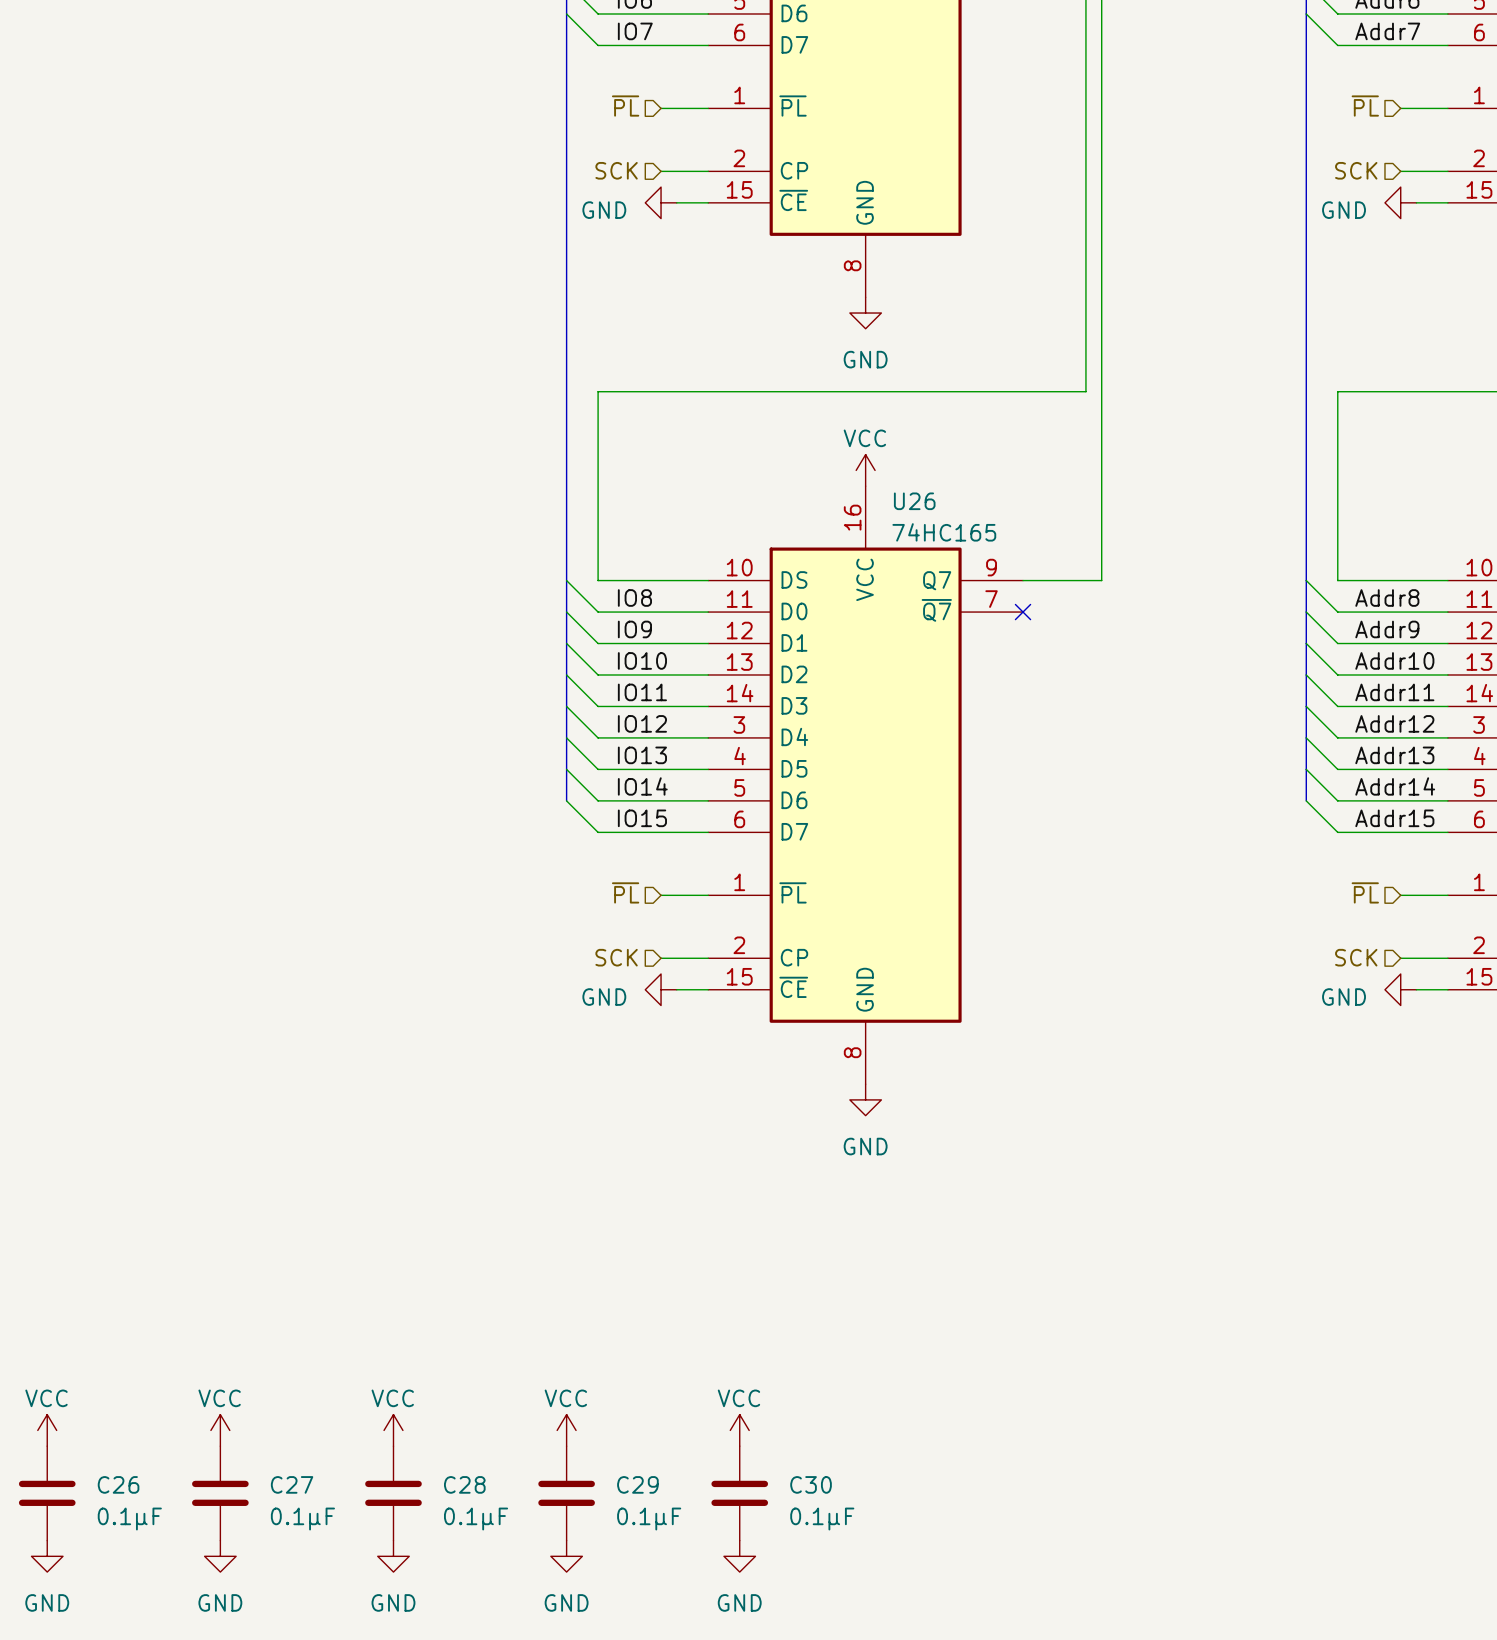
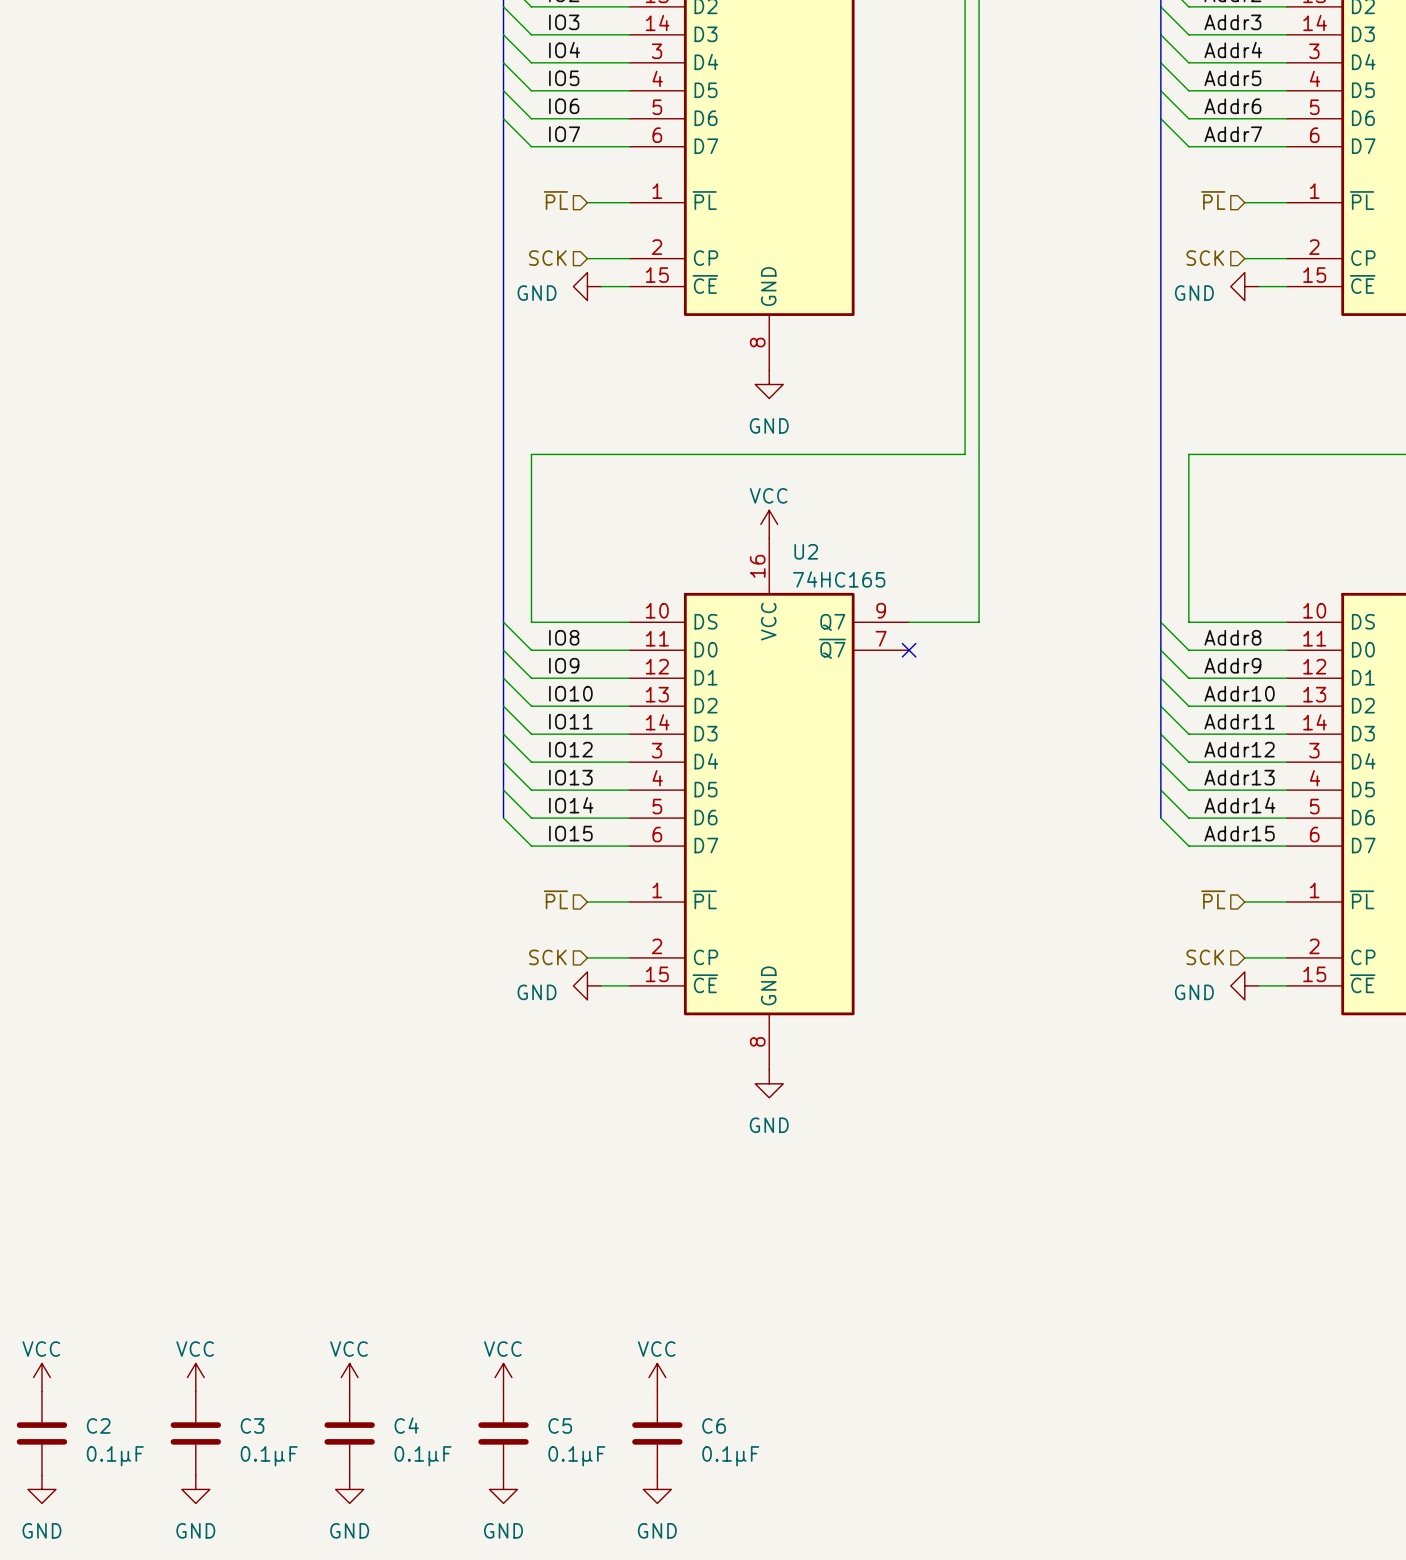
U26 name: U26 (914, 501) -> U2 (806, 551)
C26 name: C26 (118, 1484) -> C2 (98, 1425)
C27 name: C27 (292, 1484) -> C3 (252, 1425)
C28 name: C28 (464, 1484) -> C4 (406, 1425)
C29 name: C29 (637, 1484) -> C5 (560, 1425)
C30 name: C30 (811, 1484) -> C6 (714, 1425)

